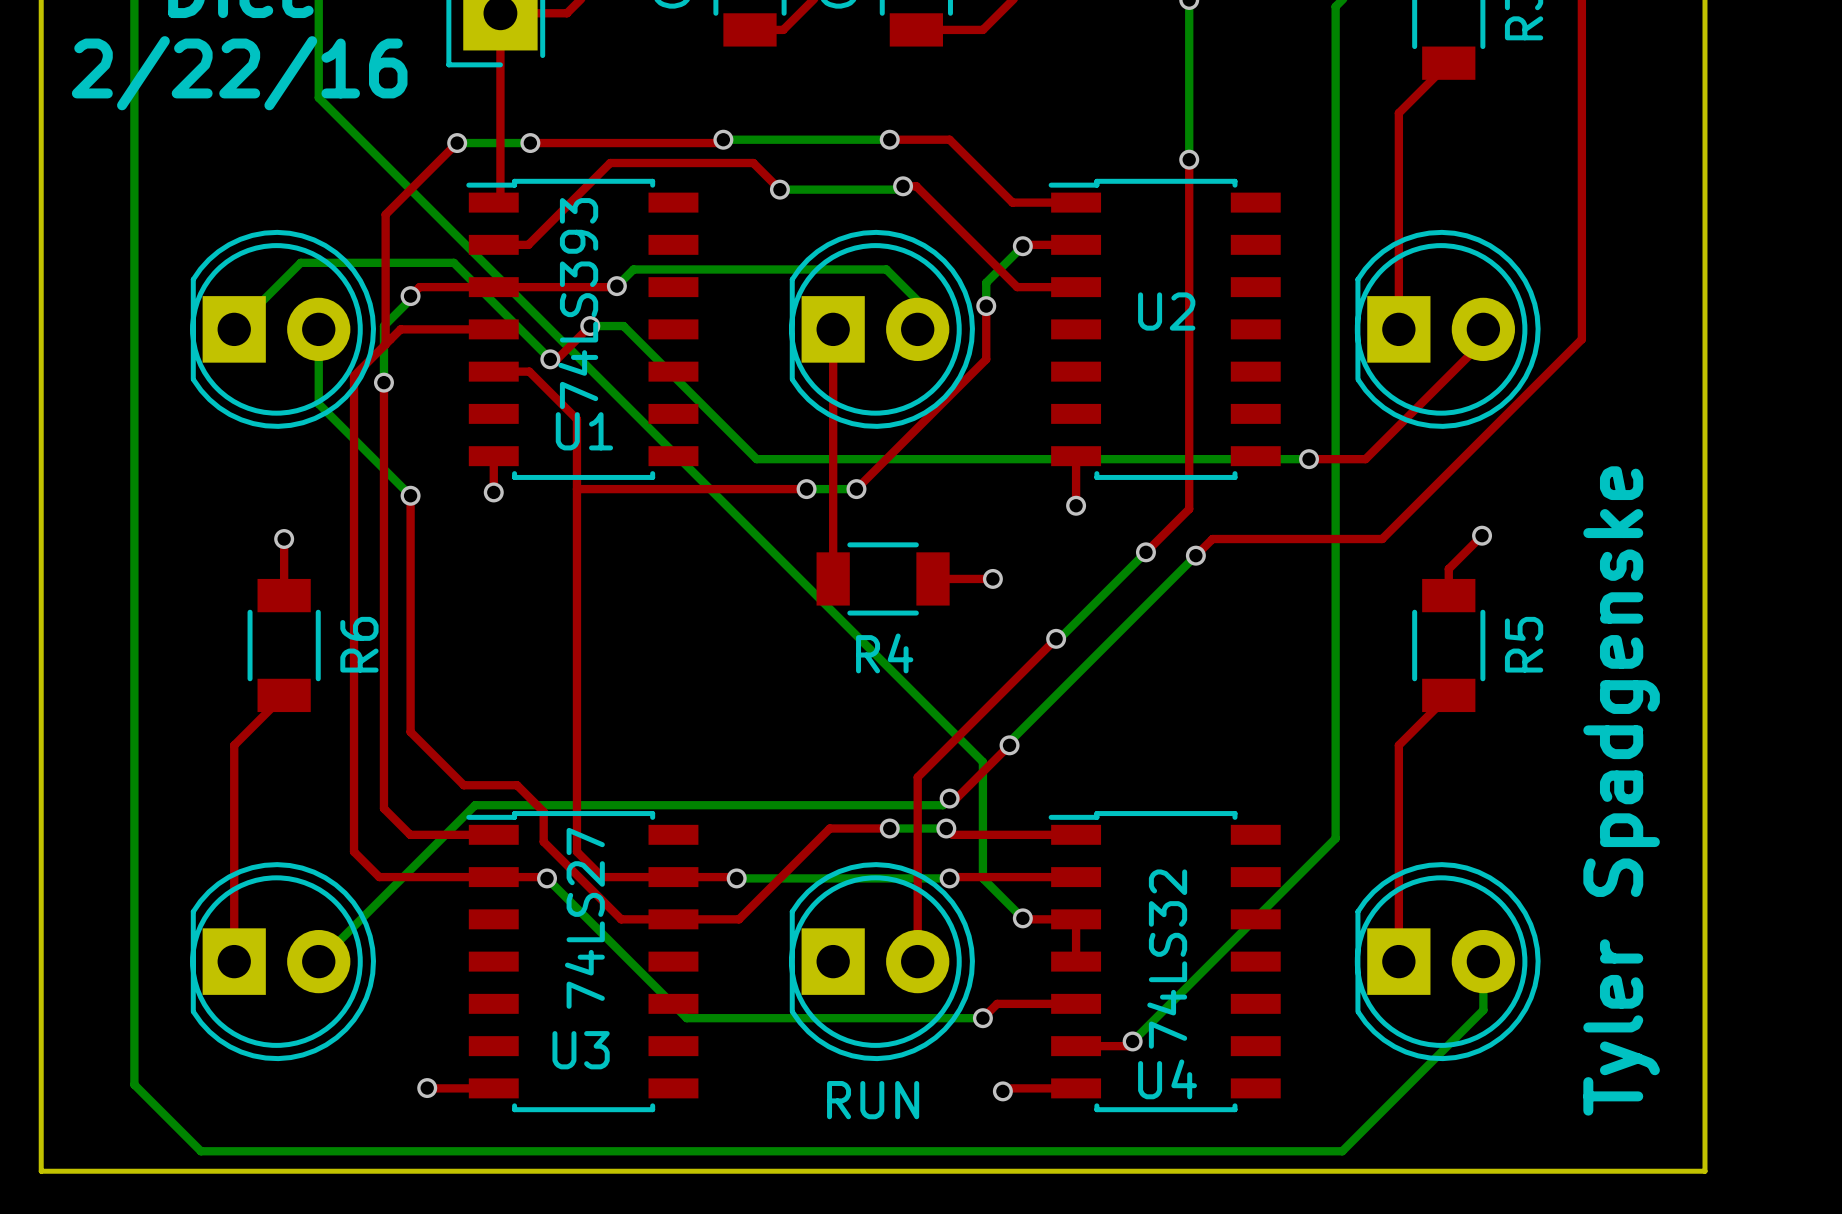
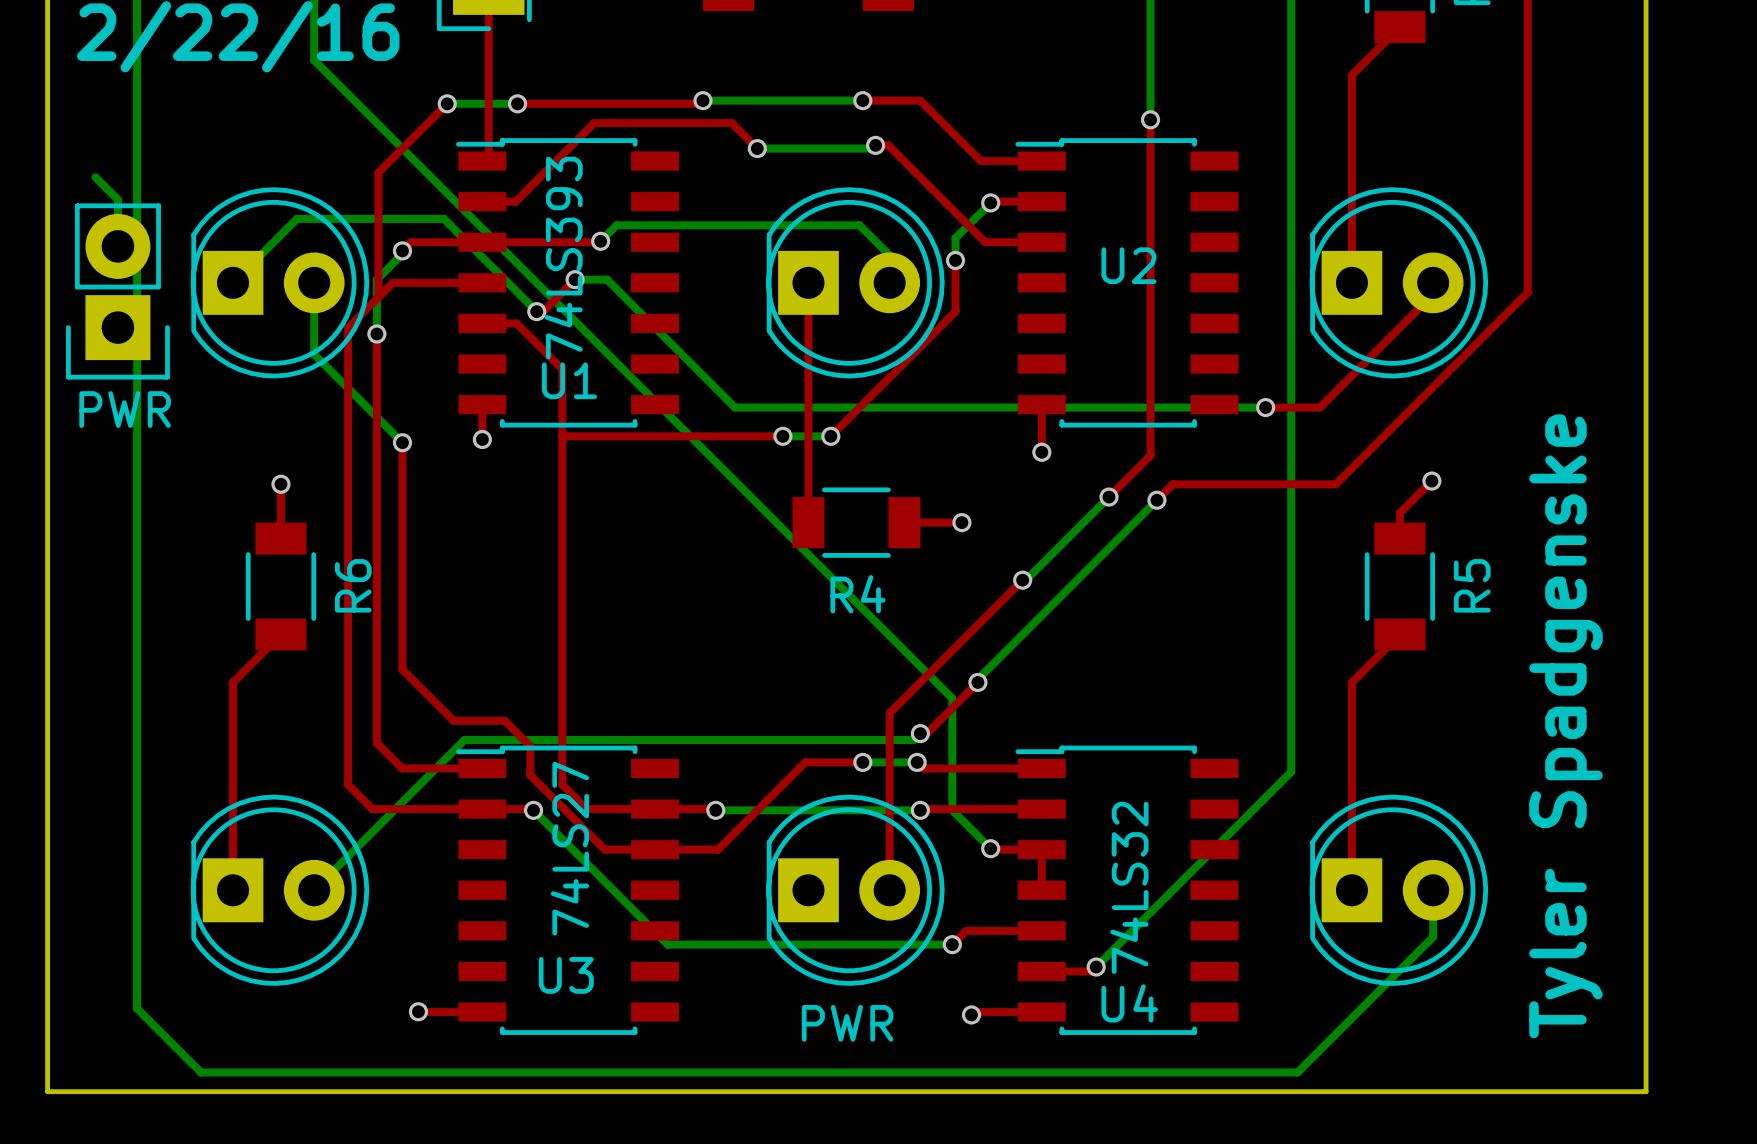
bottom track: none -> (95, 177) (117, 199) (117, 246)
part: none -> PWR (117, 291)
part value: RUN (873, 1100) -> PWR (847, 1023)

